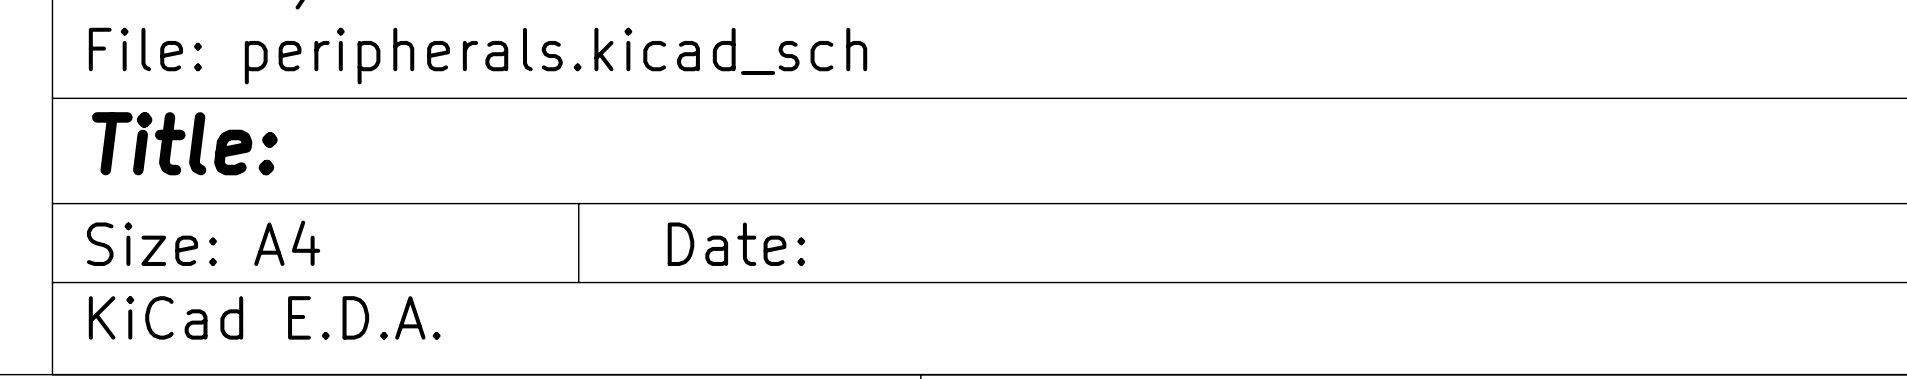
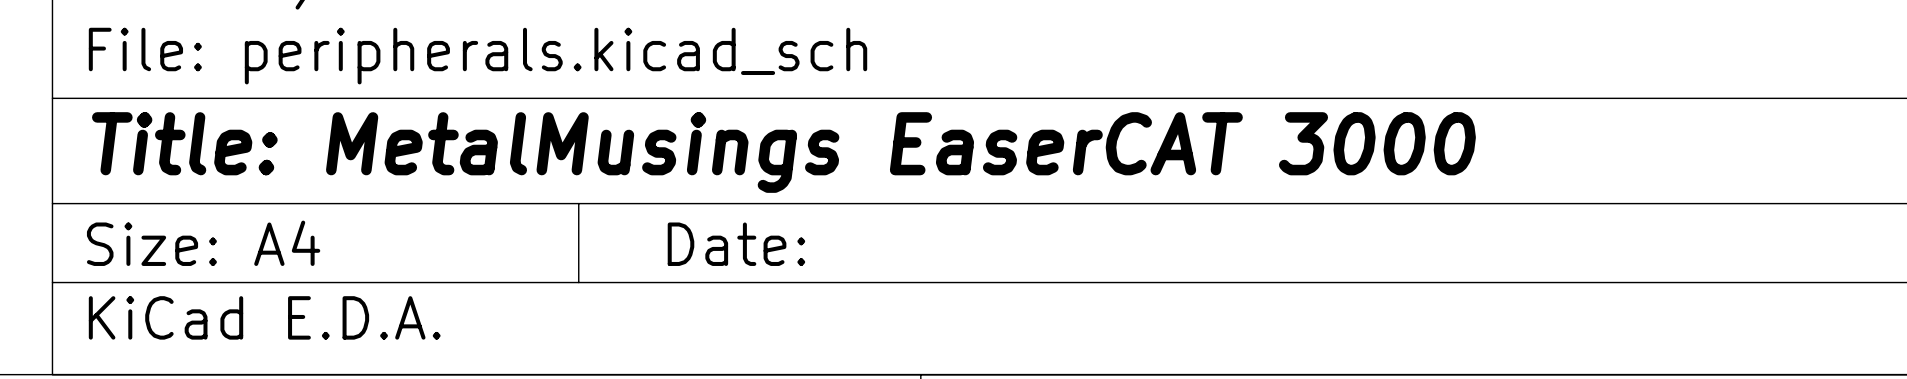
title block: Title: (184, 143) -> Title: MetalMusings EaserCAT 3000 (783, 152)

